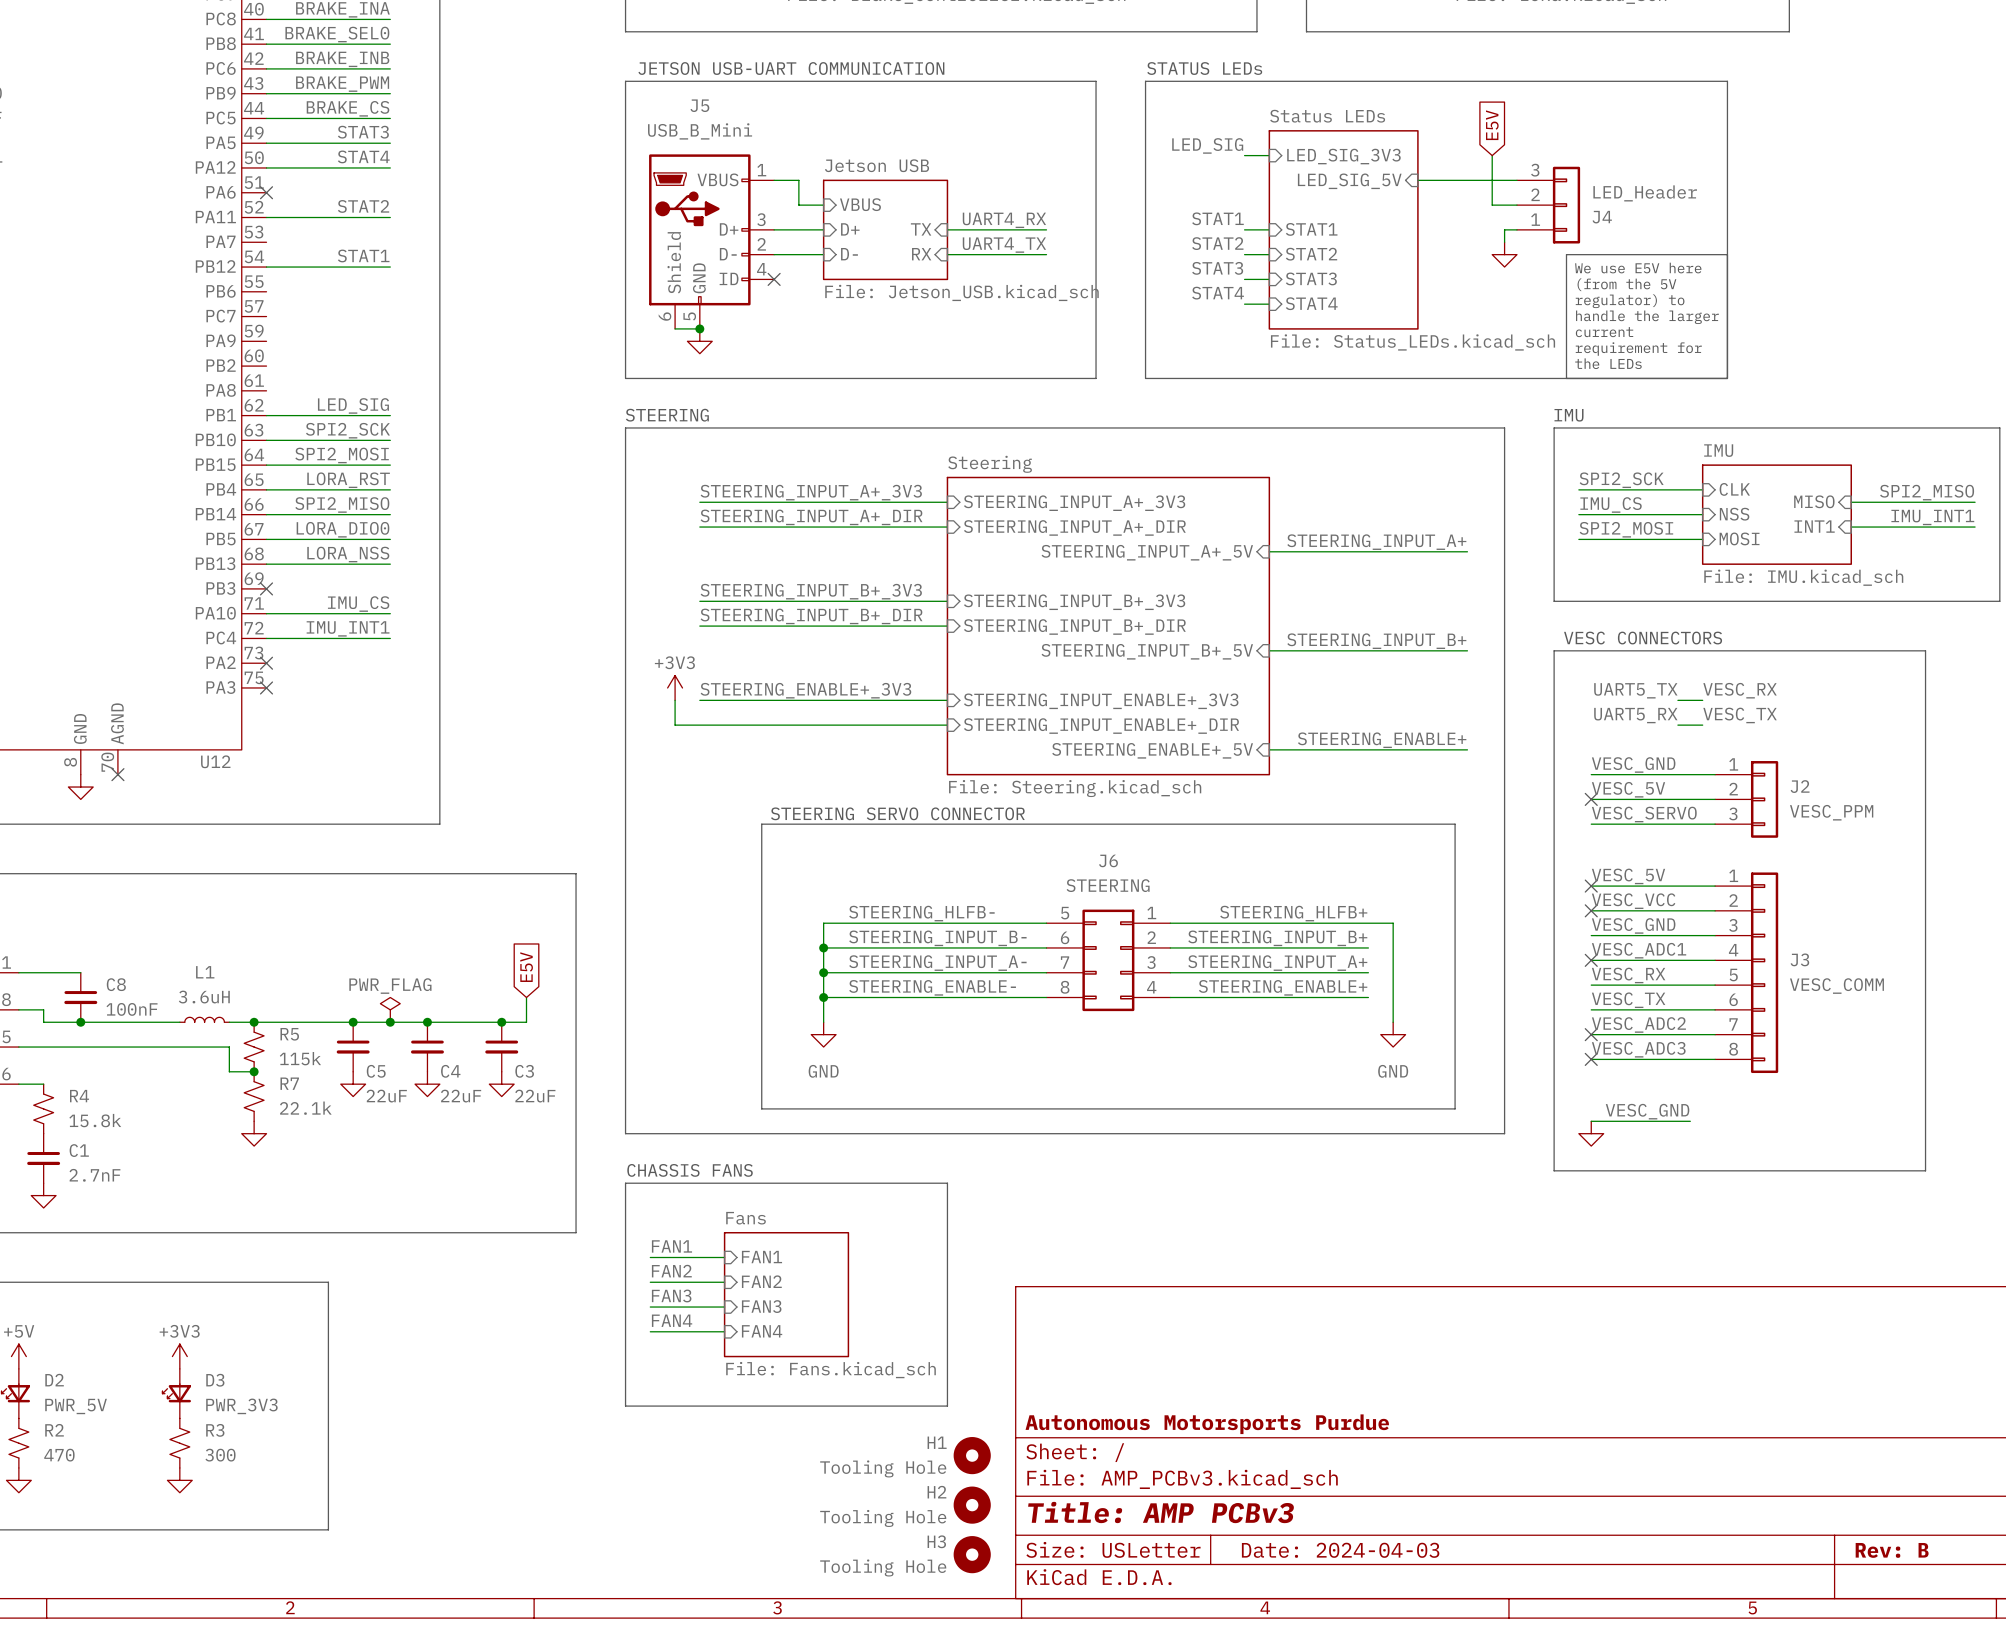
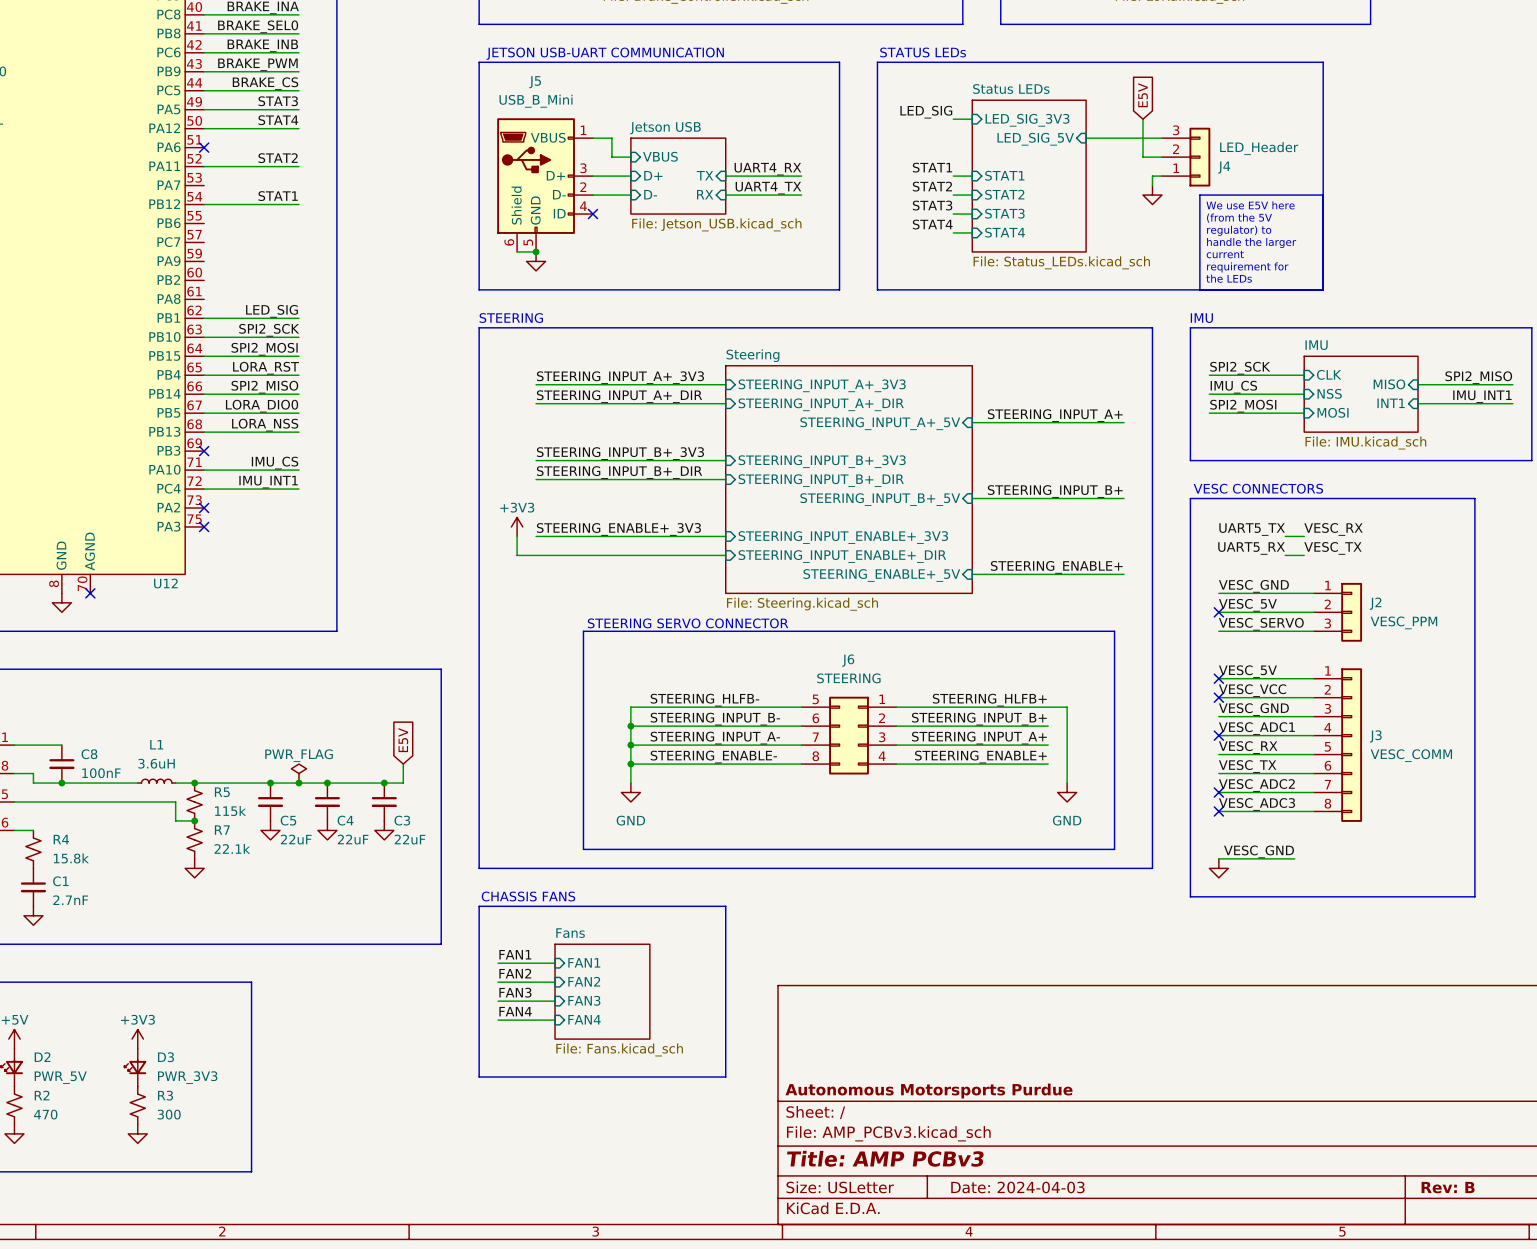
H1: Tooling Hole (972, 1455) -> none
H2: Tooling Hole (972, 1505) -> none
H3: Tooling Hole (972, 1554) -> none

